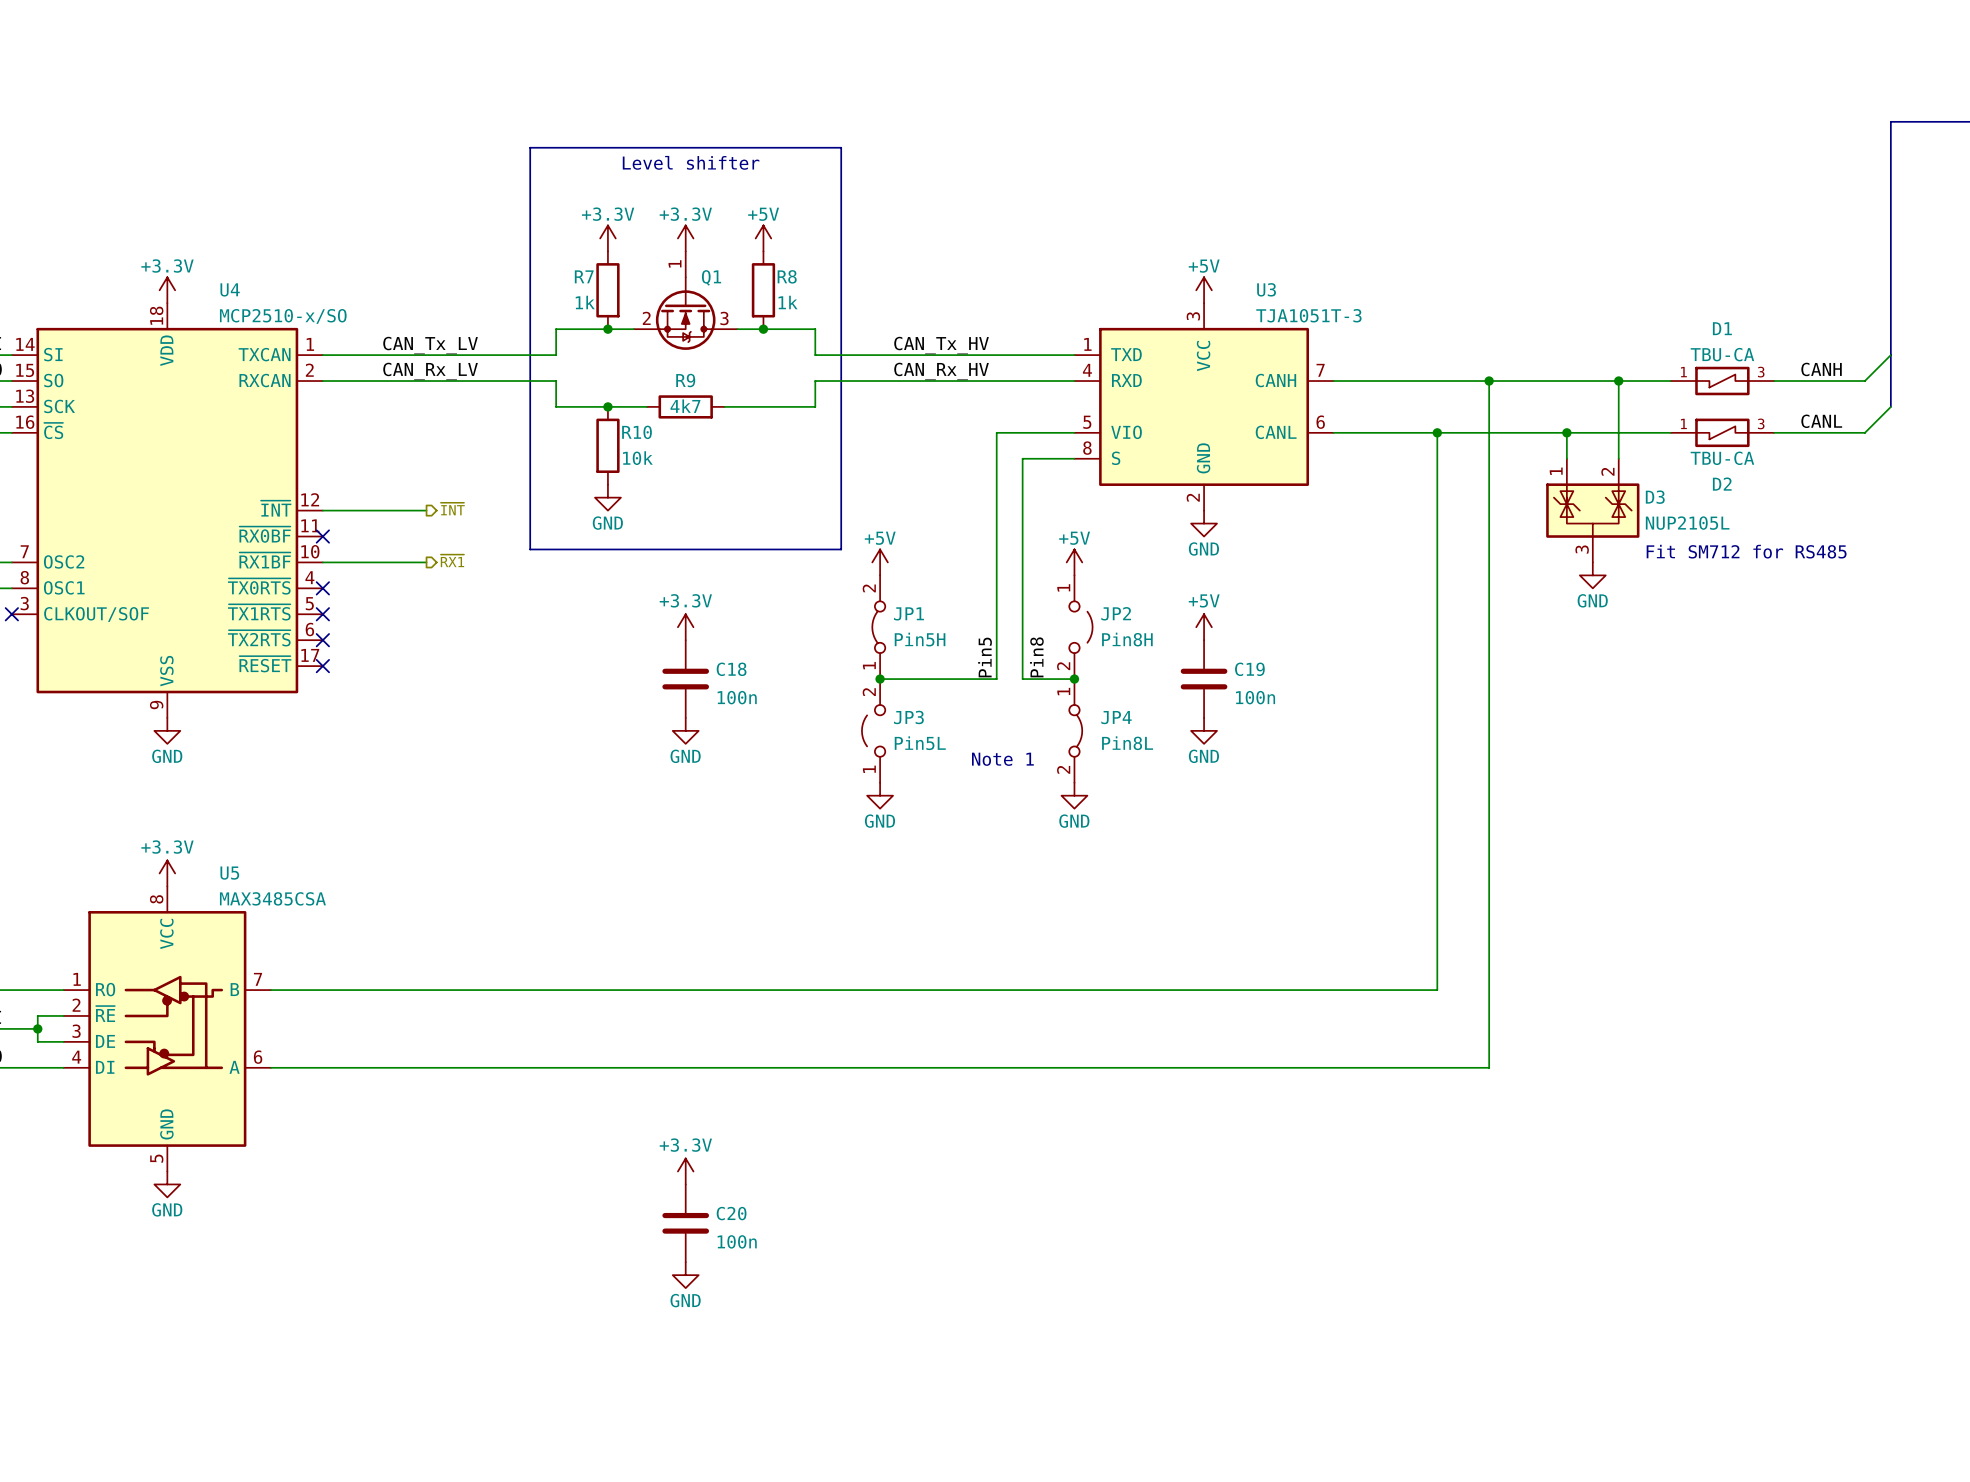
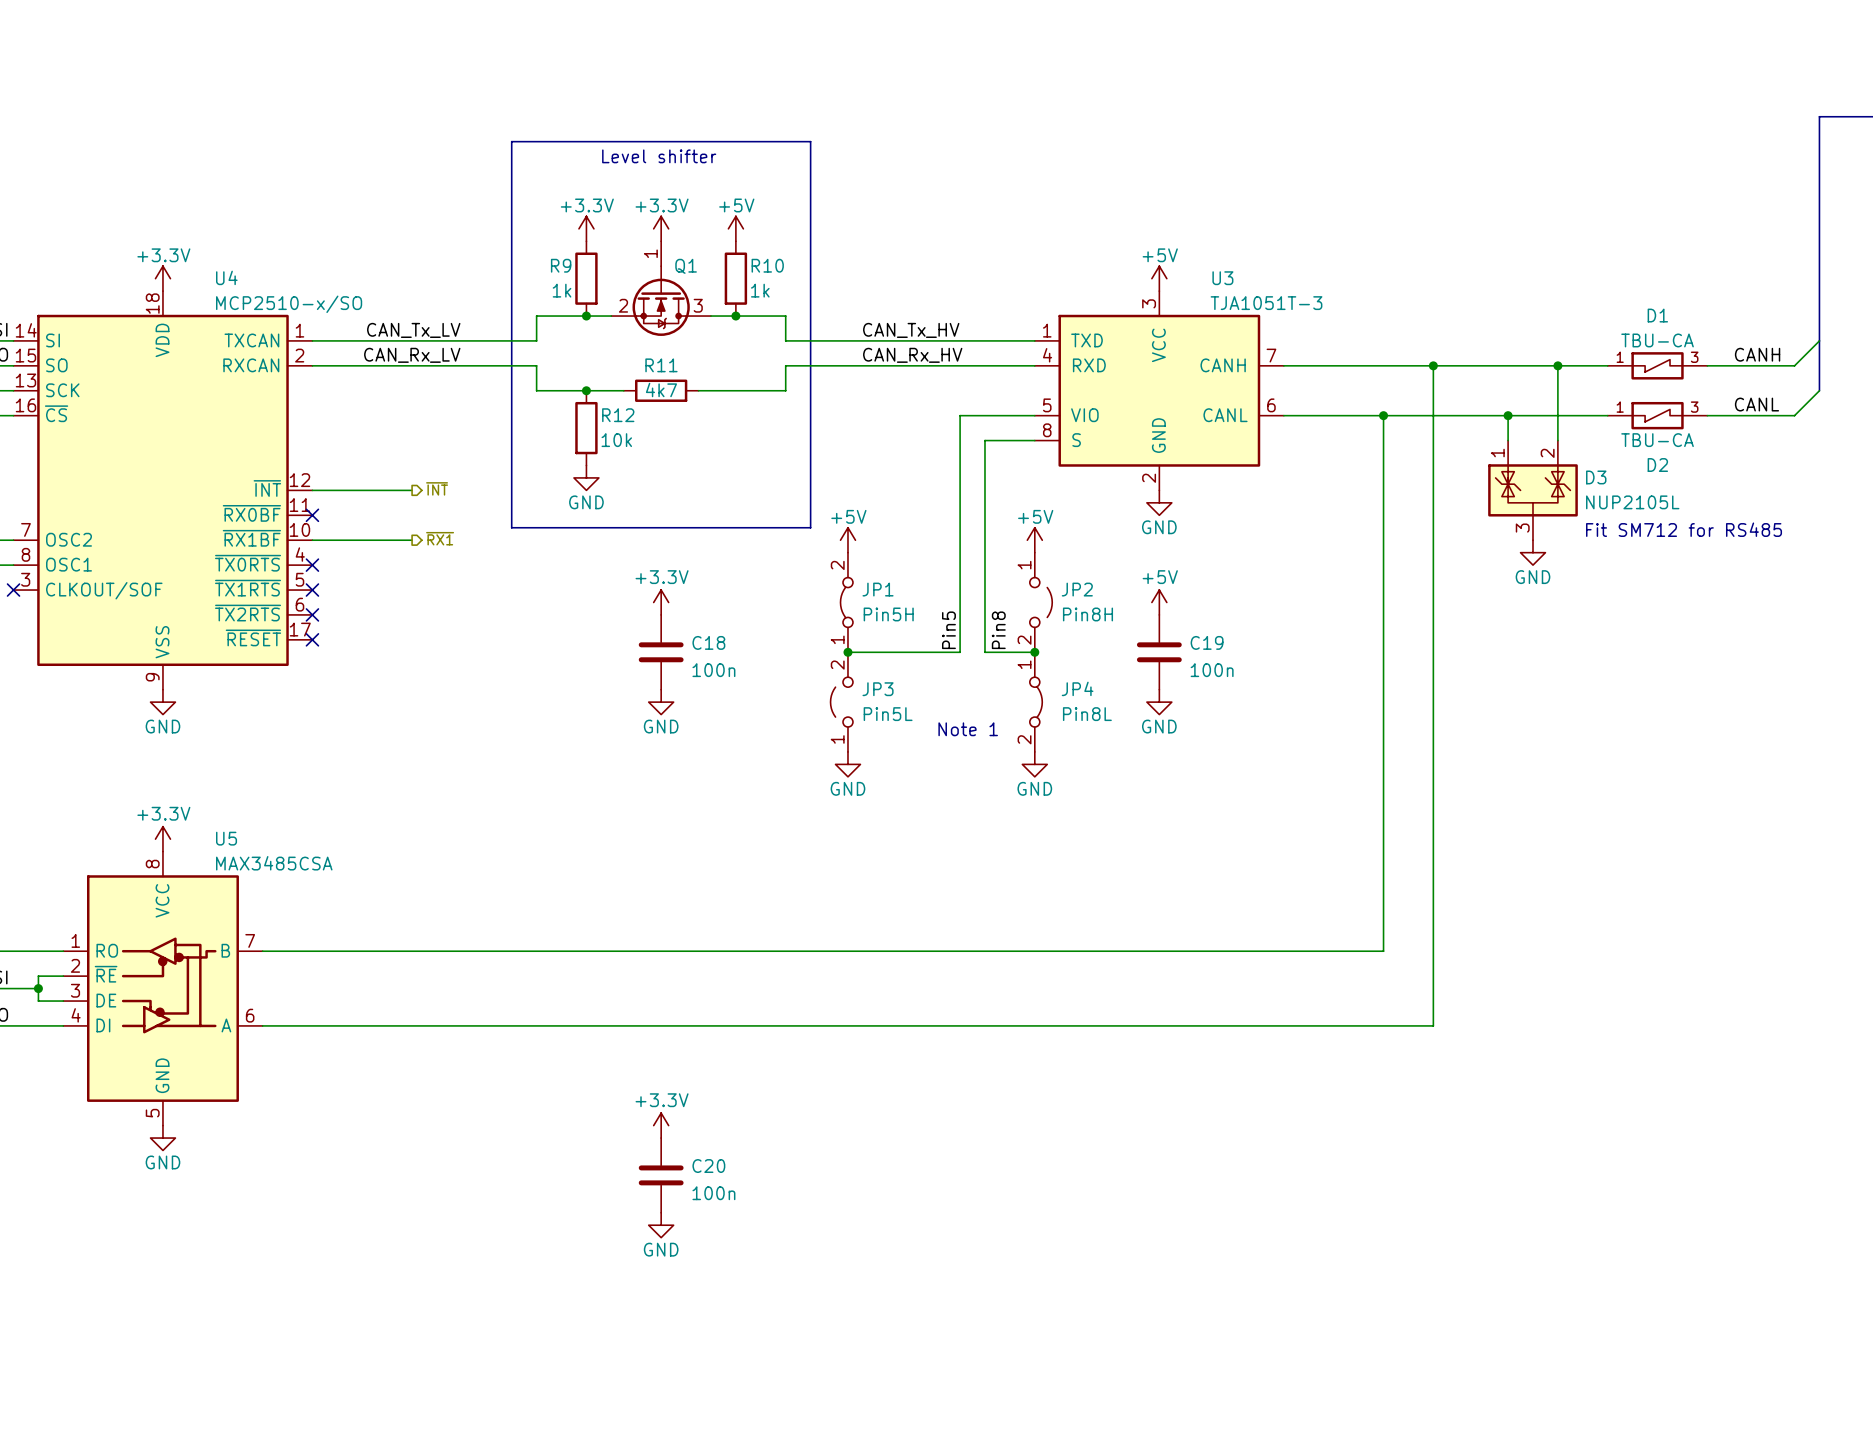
R7 name: R7 (584, 276) -> R9 (561, 265)
R8 name: R8 (787, 276) -> R10 (767, 265)
R9 name: R9 (685, 380) -> R11 (661, 365)
R10 name: R10 (637, 432) -> R12 (618, 415)

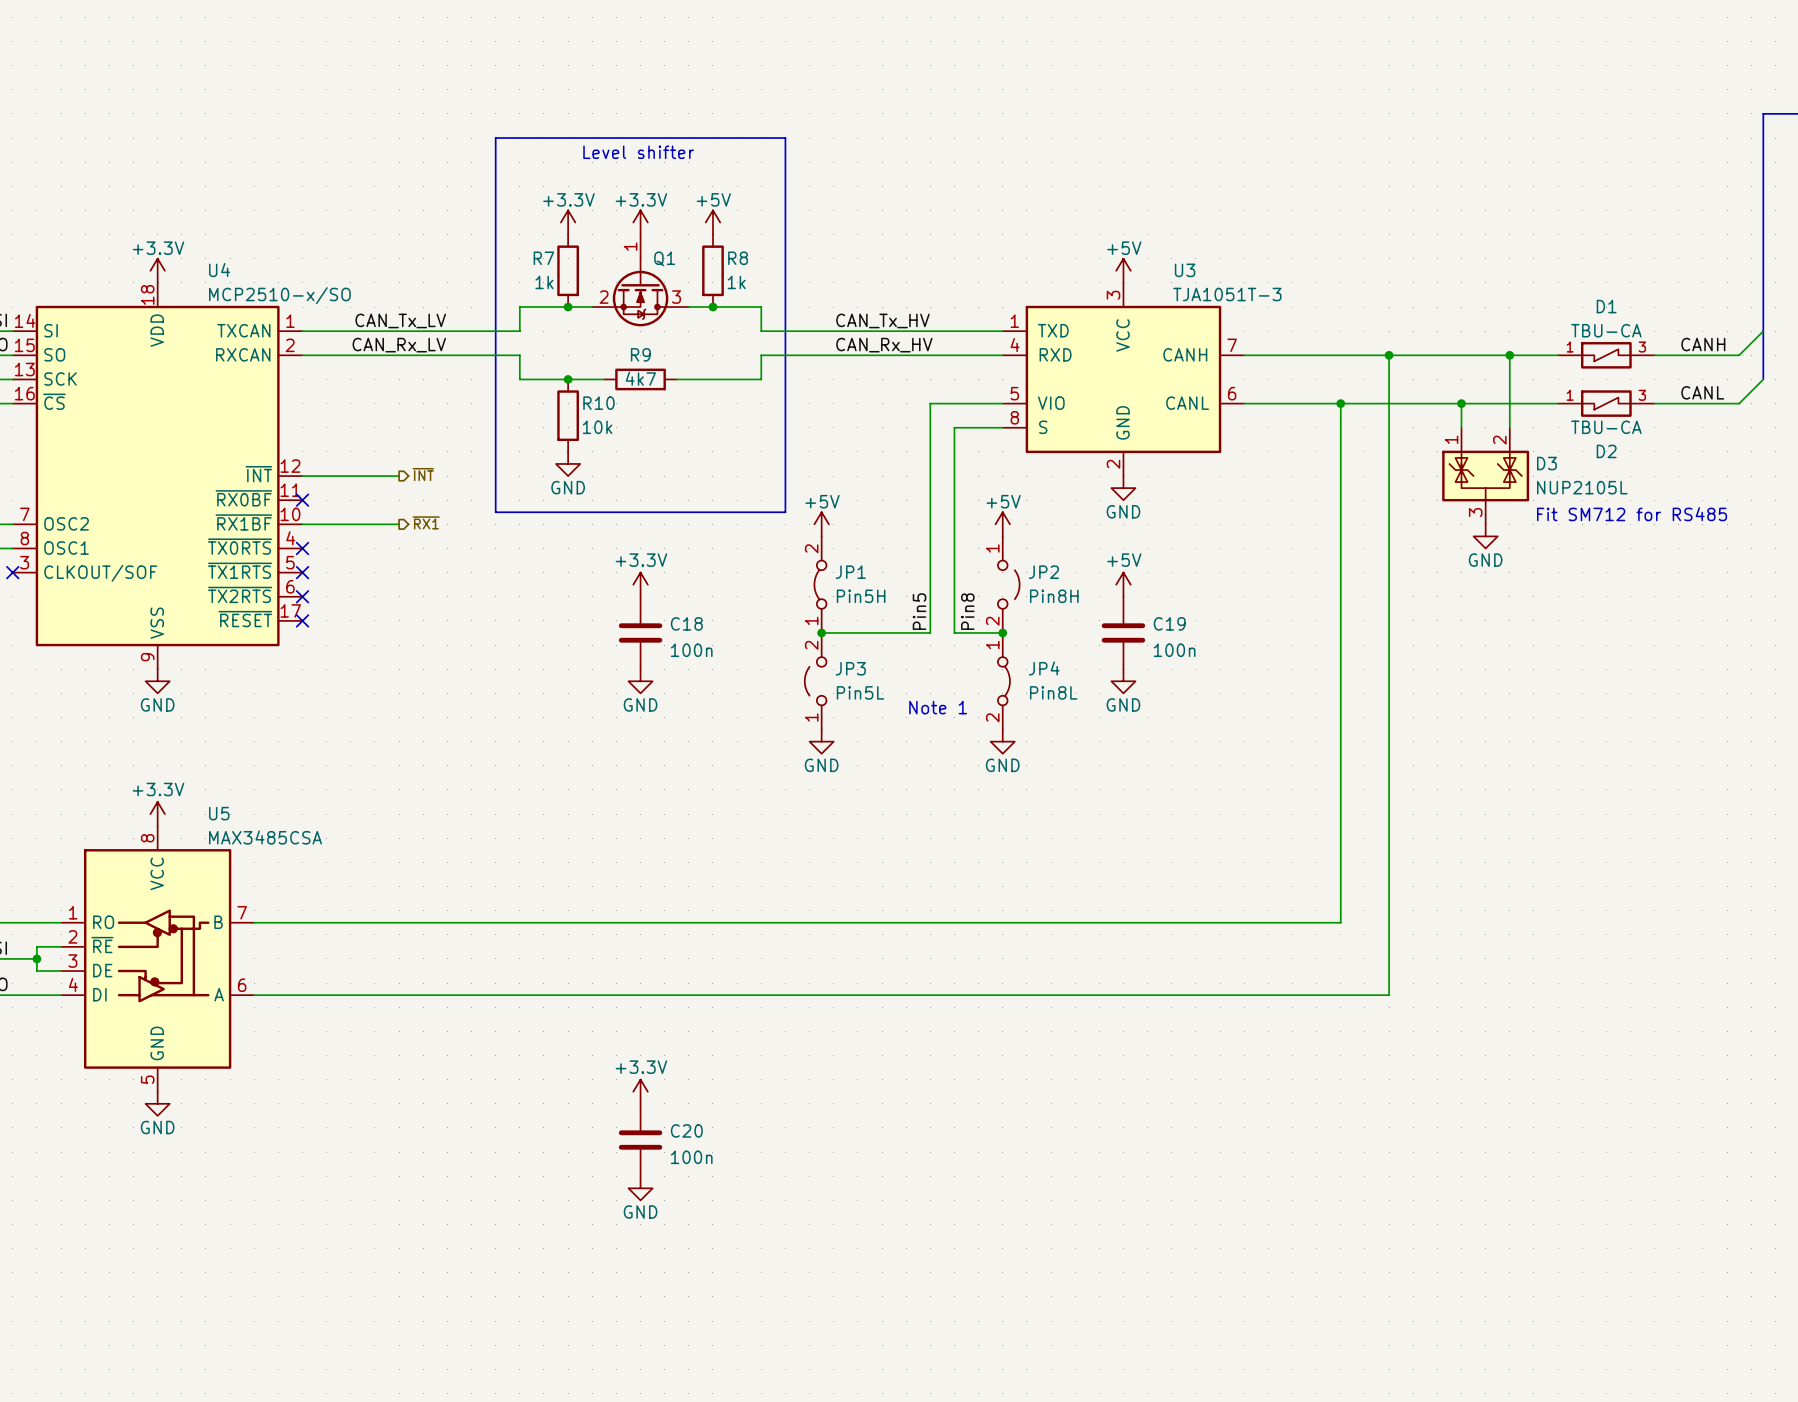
R9 name: R9 (561, 265) -> R7 (543, 258)
R10 name: R10 (767, 265) -> R8 (738, 258)
R11 name: R11 (661, 365) -> R9 (640, 354)
R12 name: R12 (618, 415) -> R10 (598, 403)

